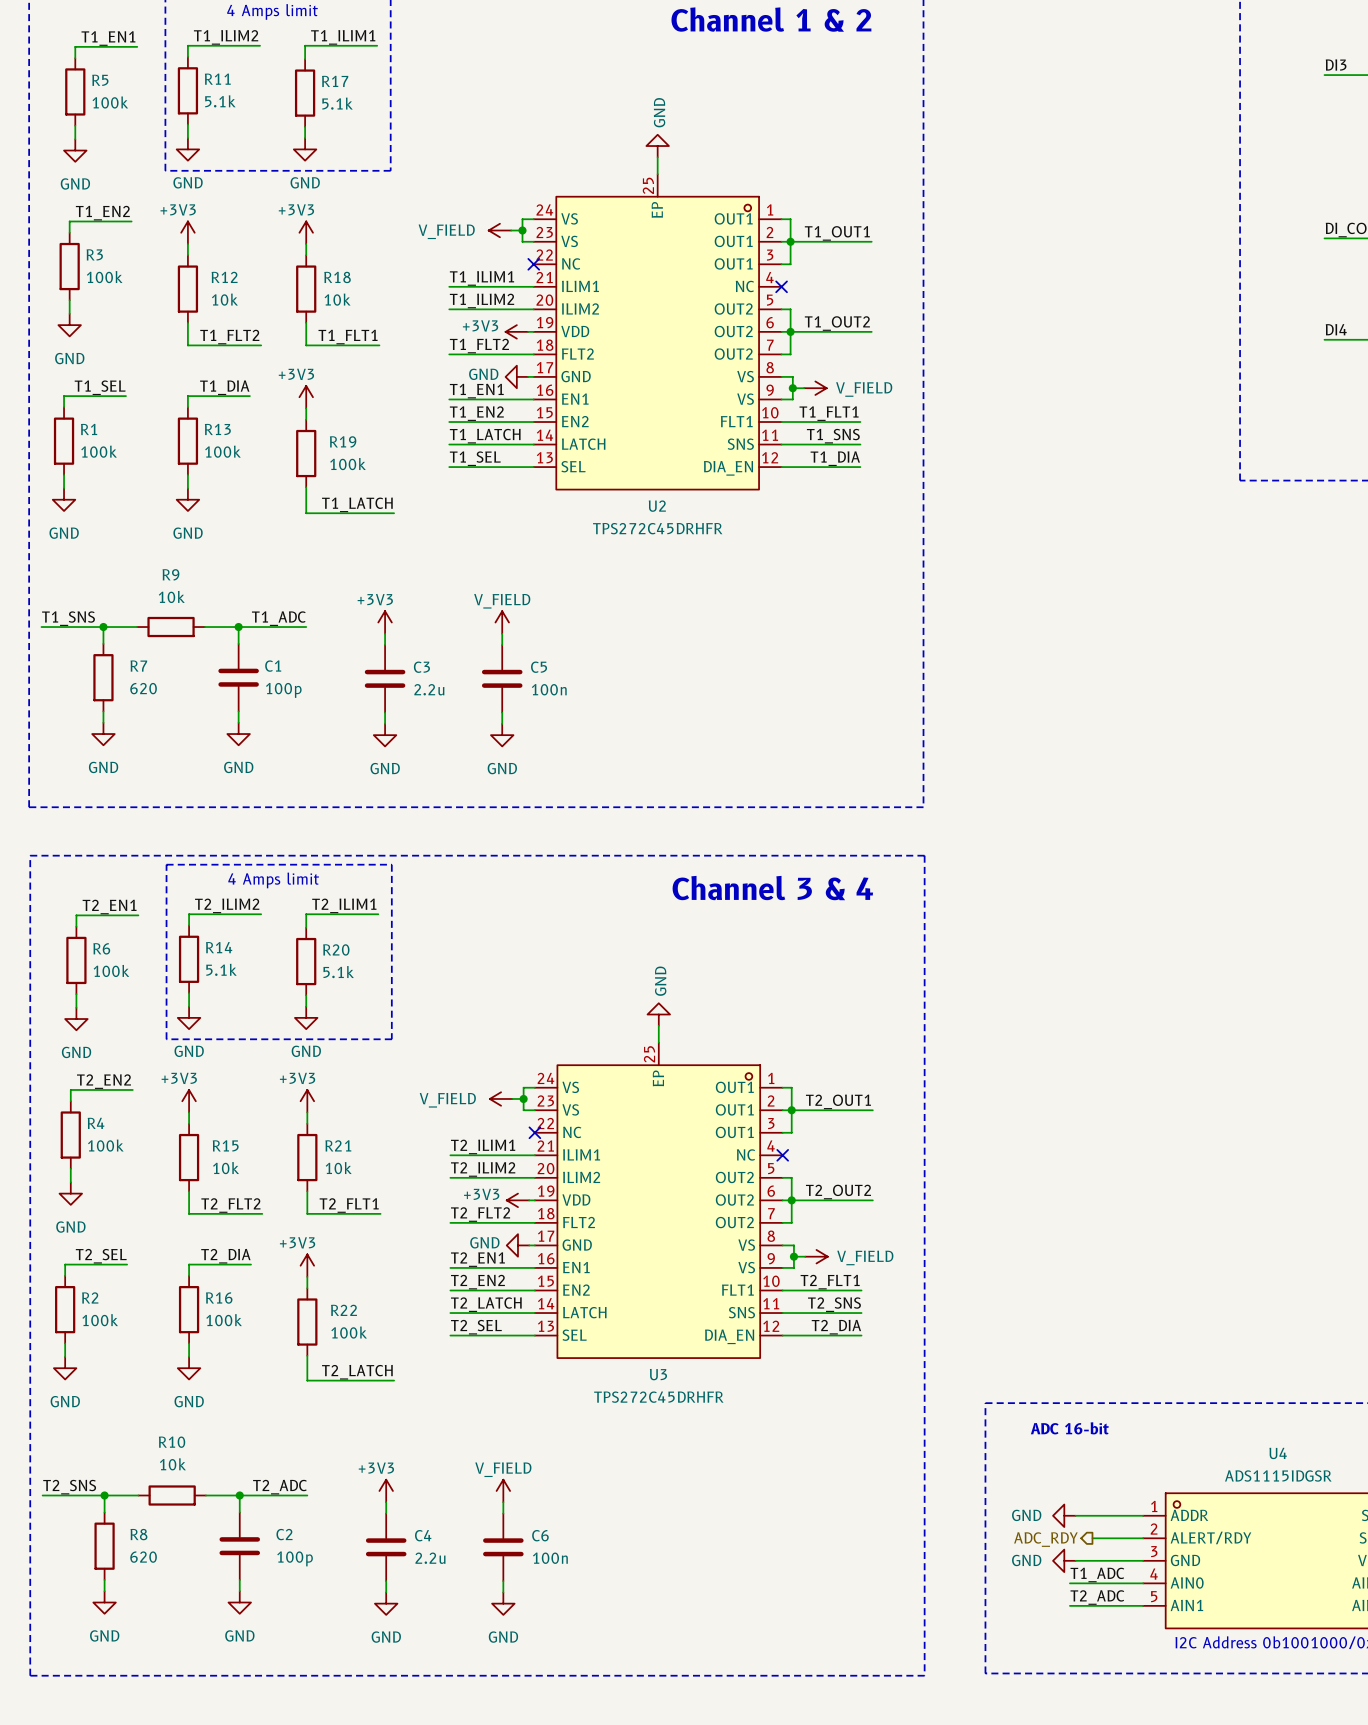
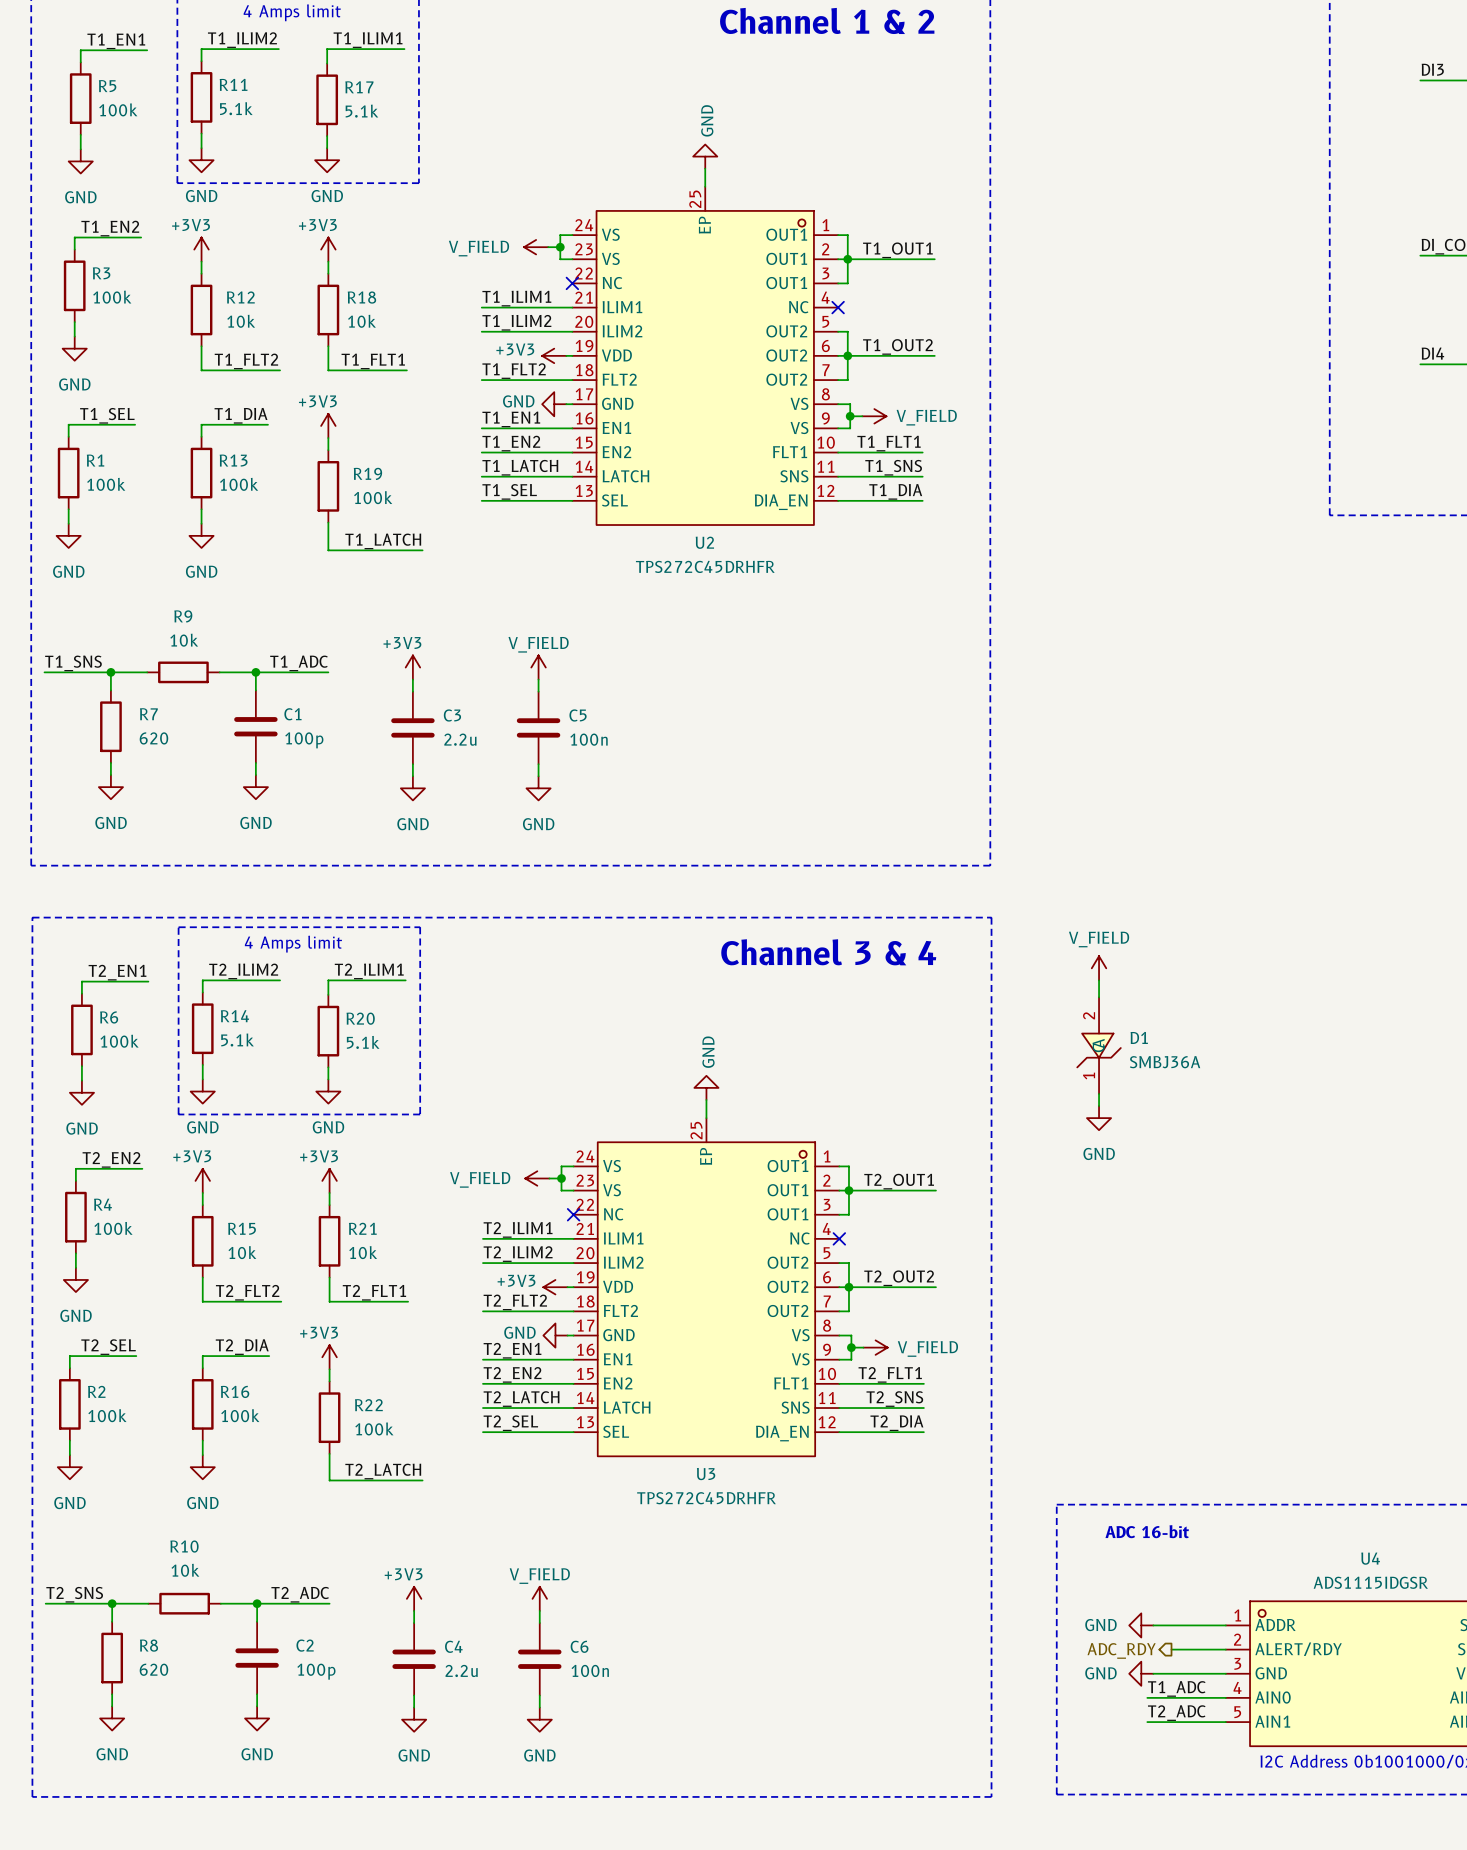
power symbol: none -> V_FIELD (1099, 968)
wire: none -> (1099, 980) (1099, 997)
D1: none -> SMBJ36A (1099, 1045)
wire: none -> (1099, 1093) (1099, 1106)
power symbol: none -> GND (1099, 1118)

